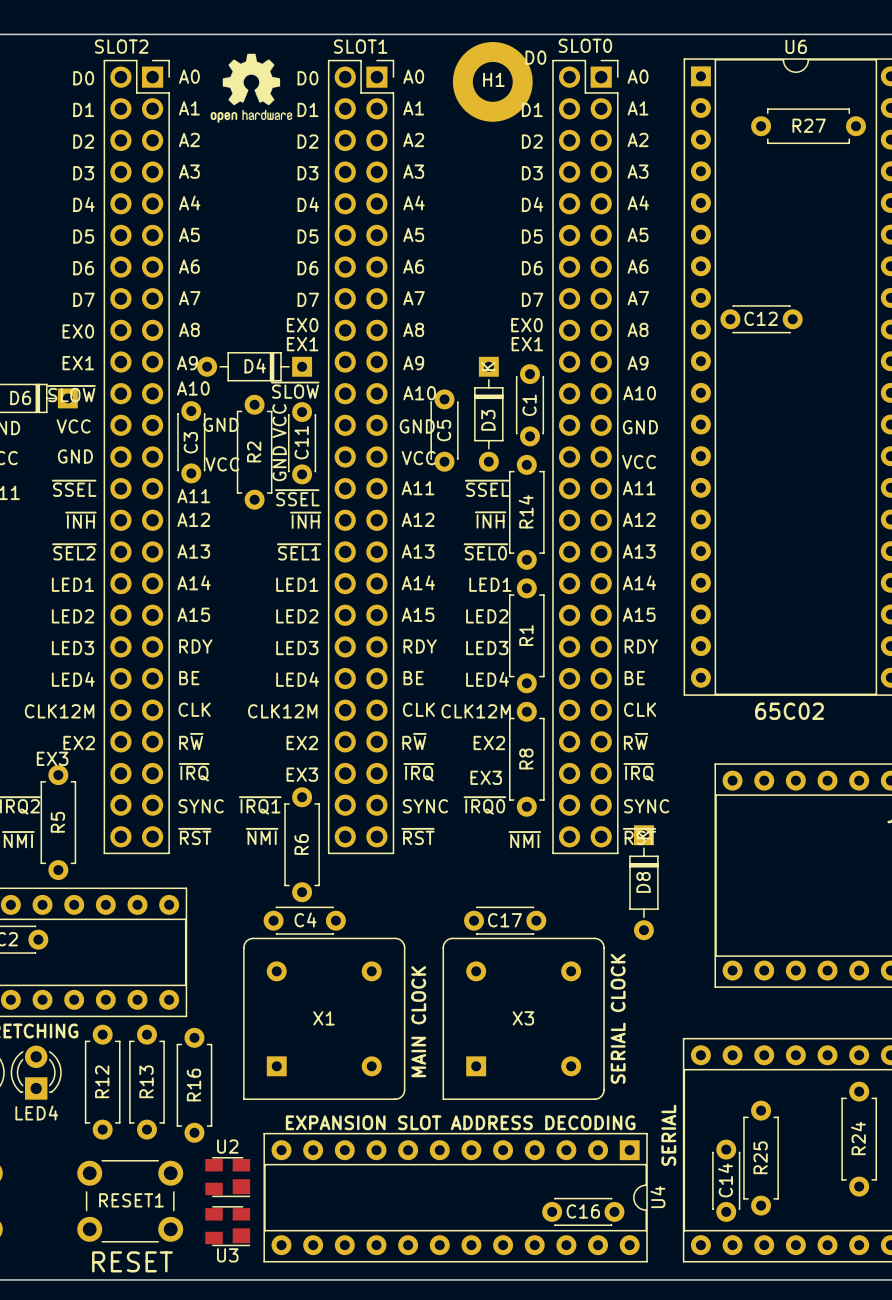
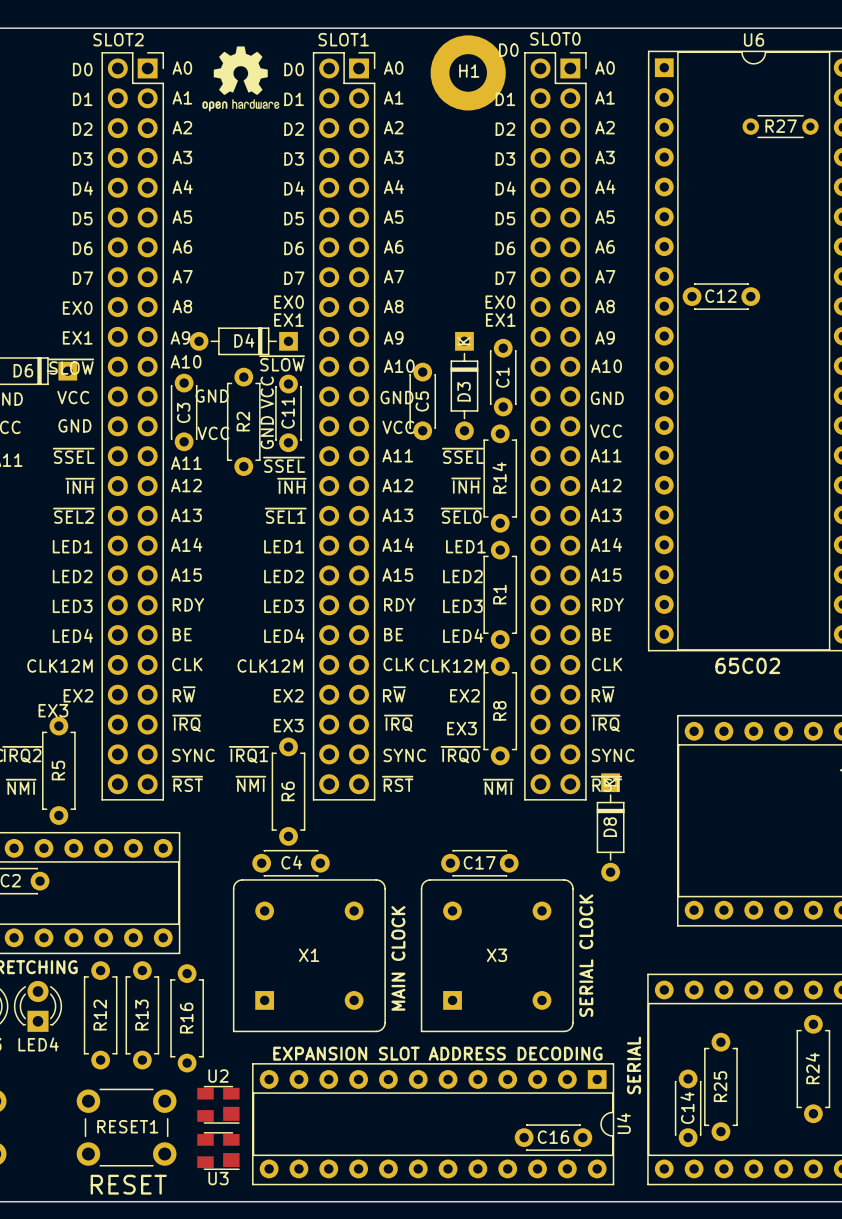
R27 footprint: [751, 108, 866, 145] -> [742, 115, 819, 139]

